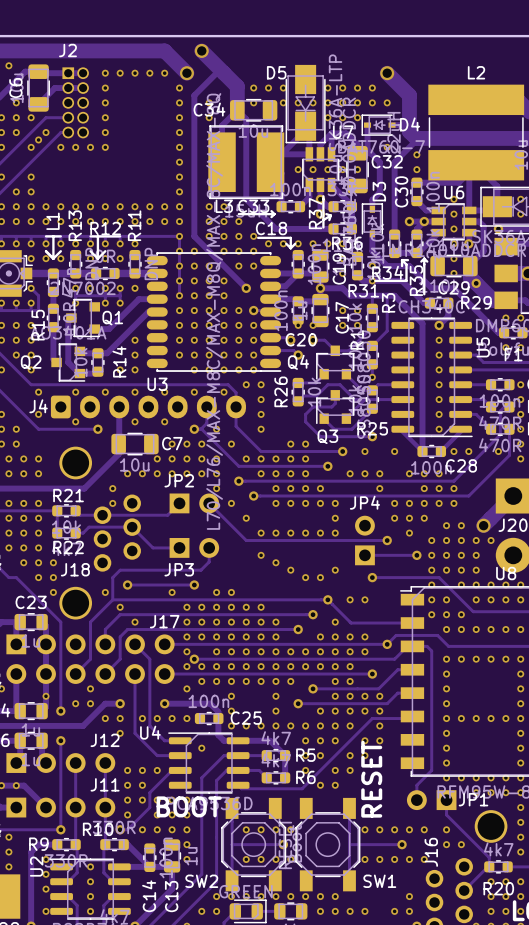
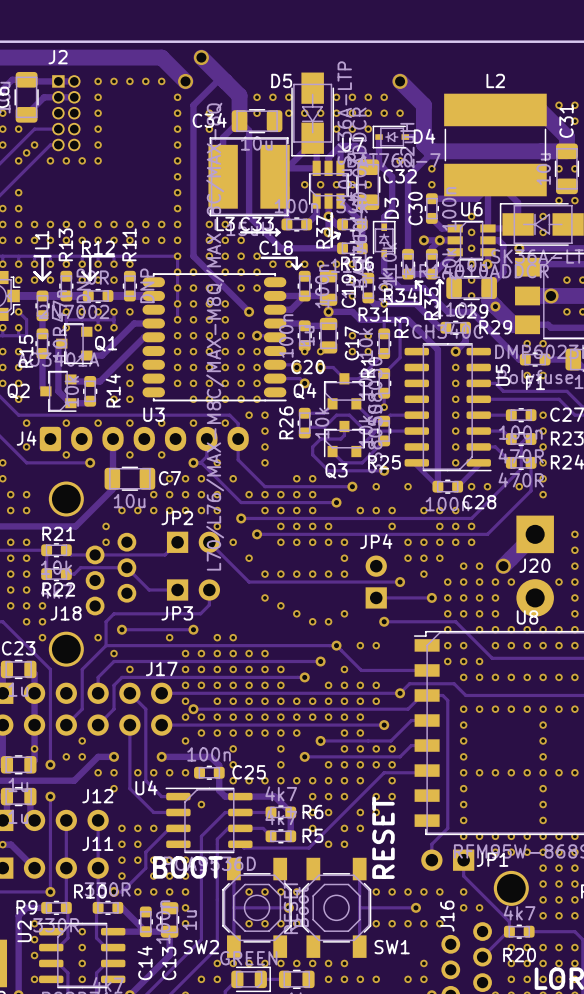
R5 name: R5 (305, 755) -> R6 (312, 812)
R6 name: R6 (305, 777) -> R5 (312, 835)

